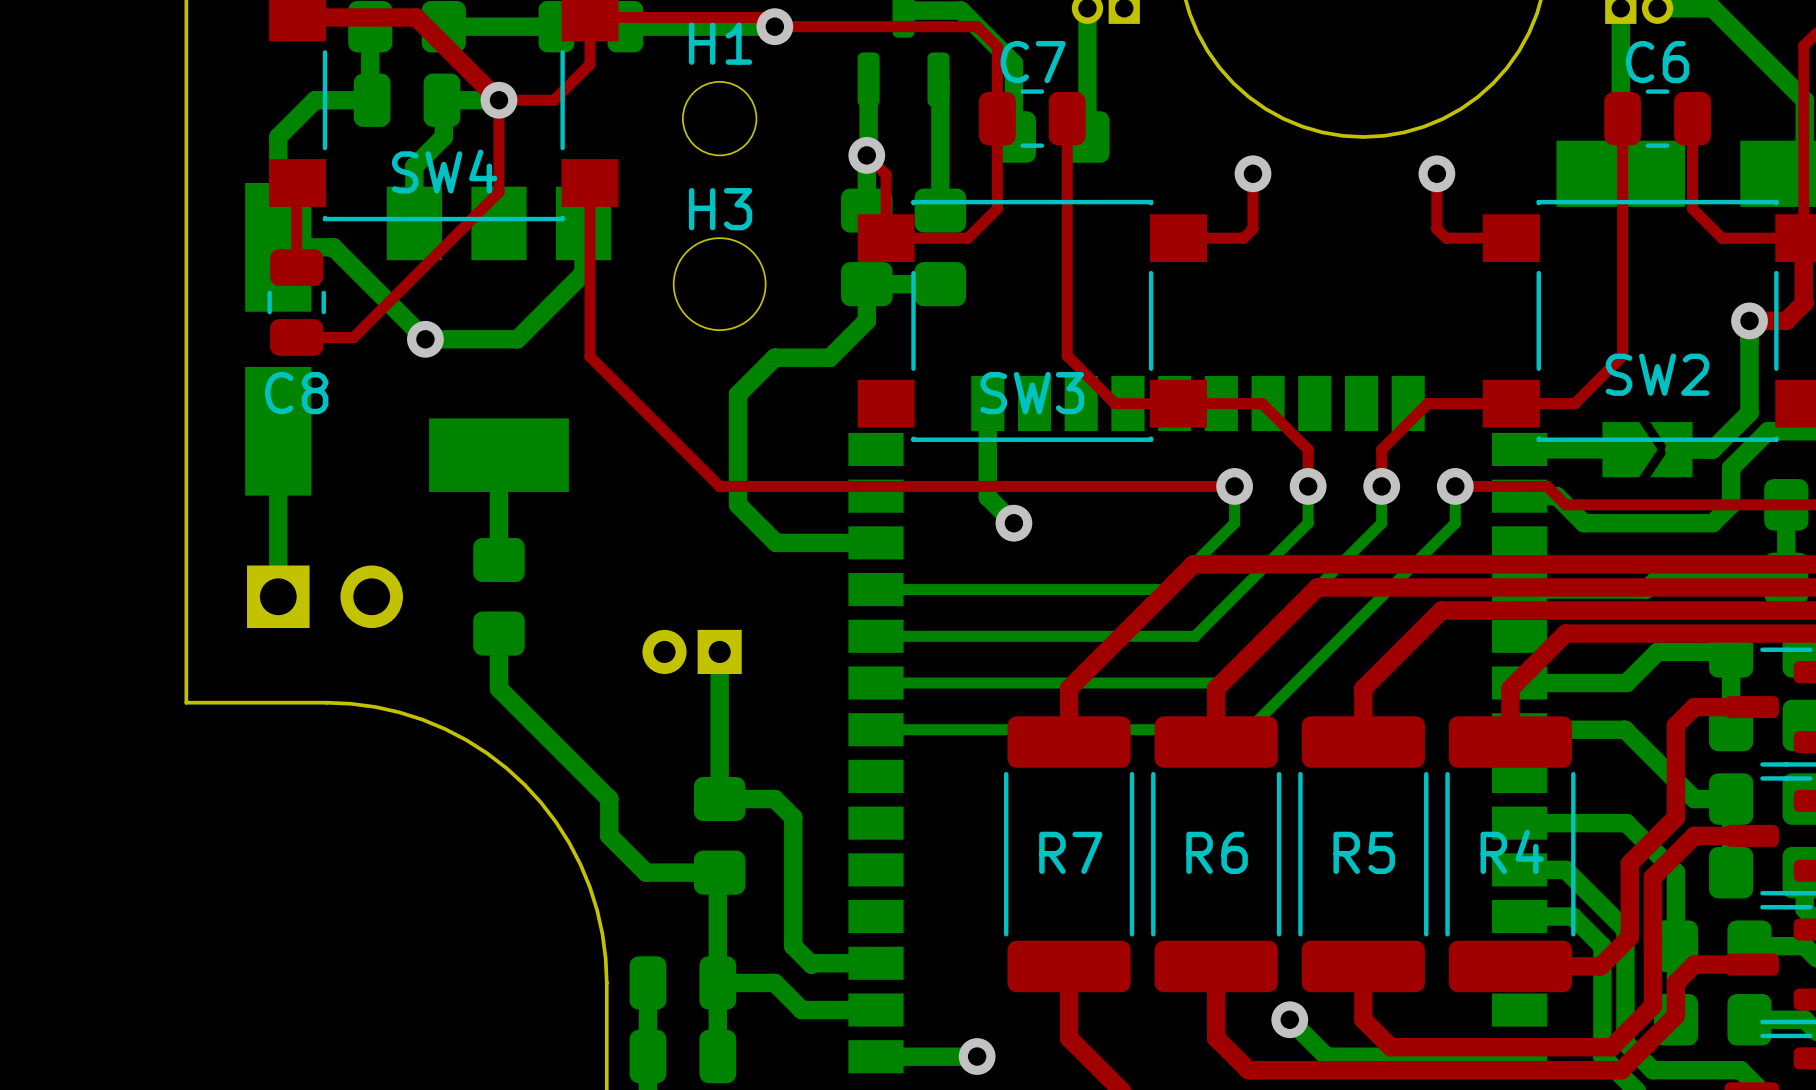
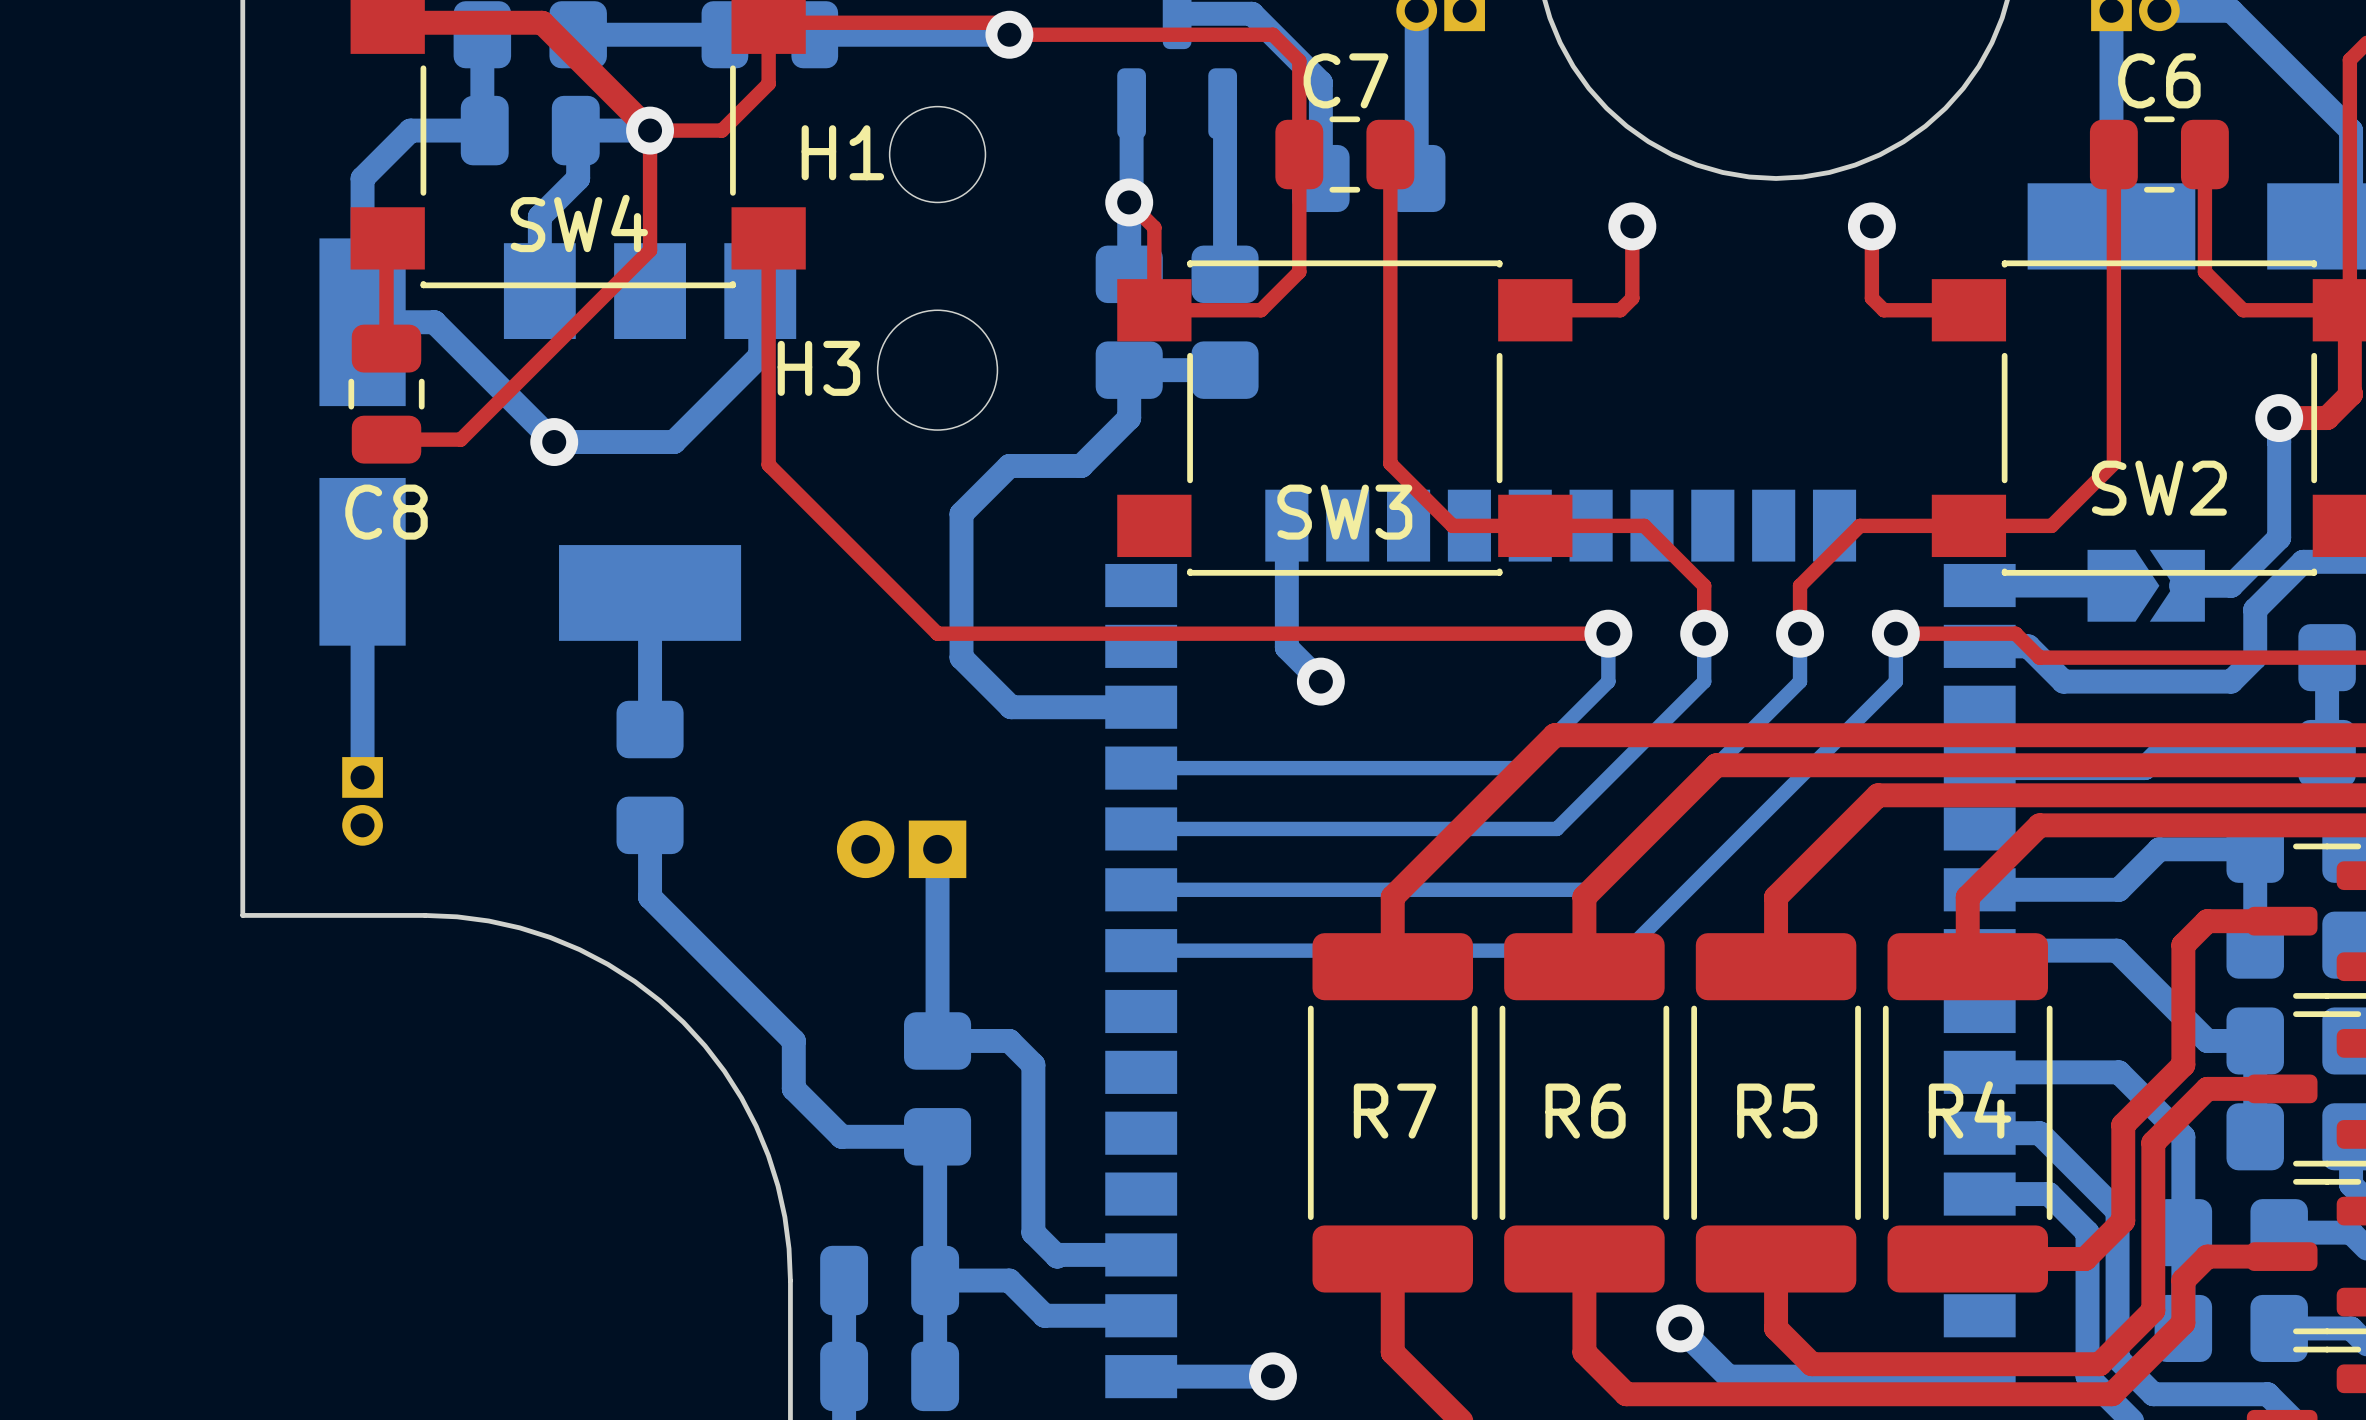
H1 name position: H1 (720, 43) -> H1 (842, 152)
H3 name position: H3 (720, 209) -> H3 (818, 368)
part: (325, 596) -> none
part: none -> (362, 801)

